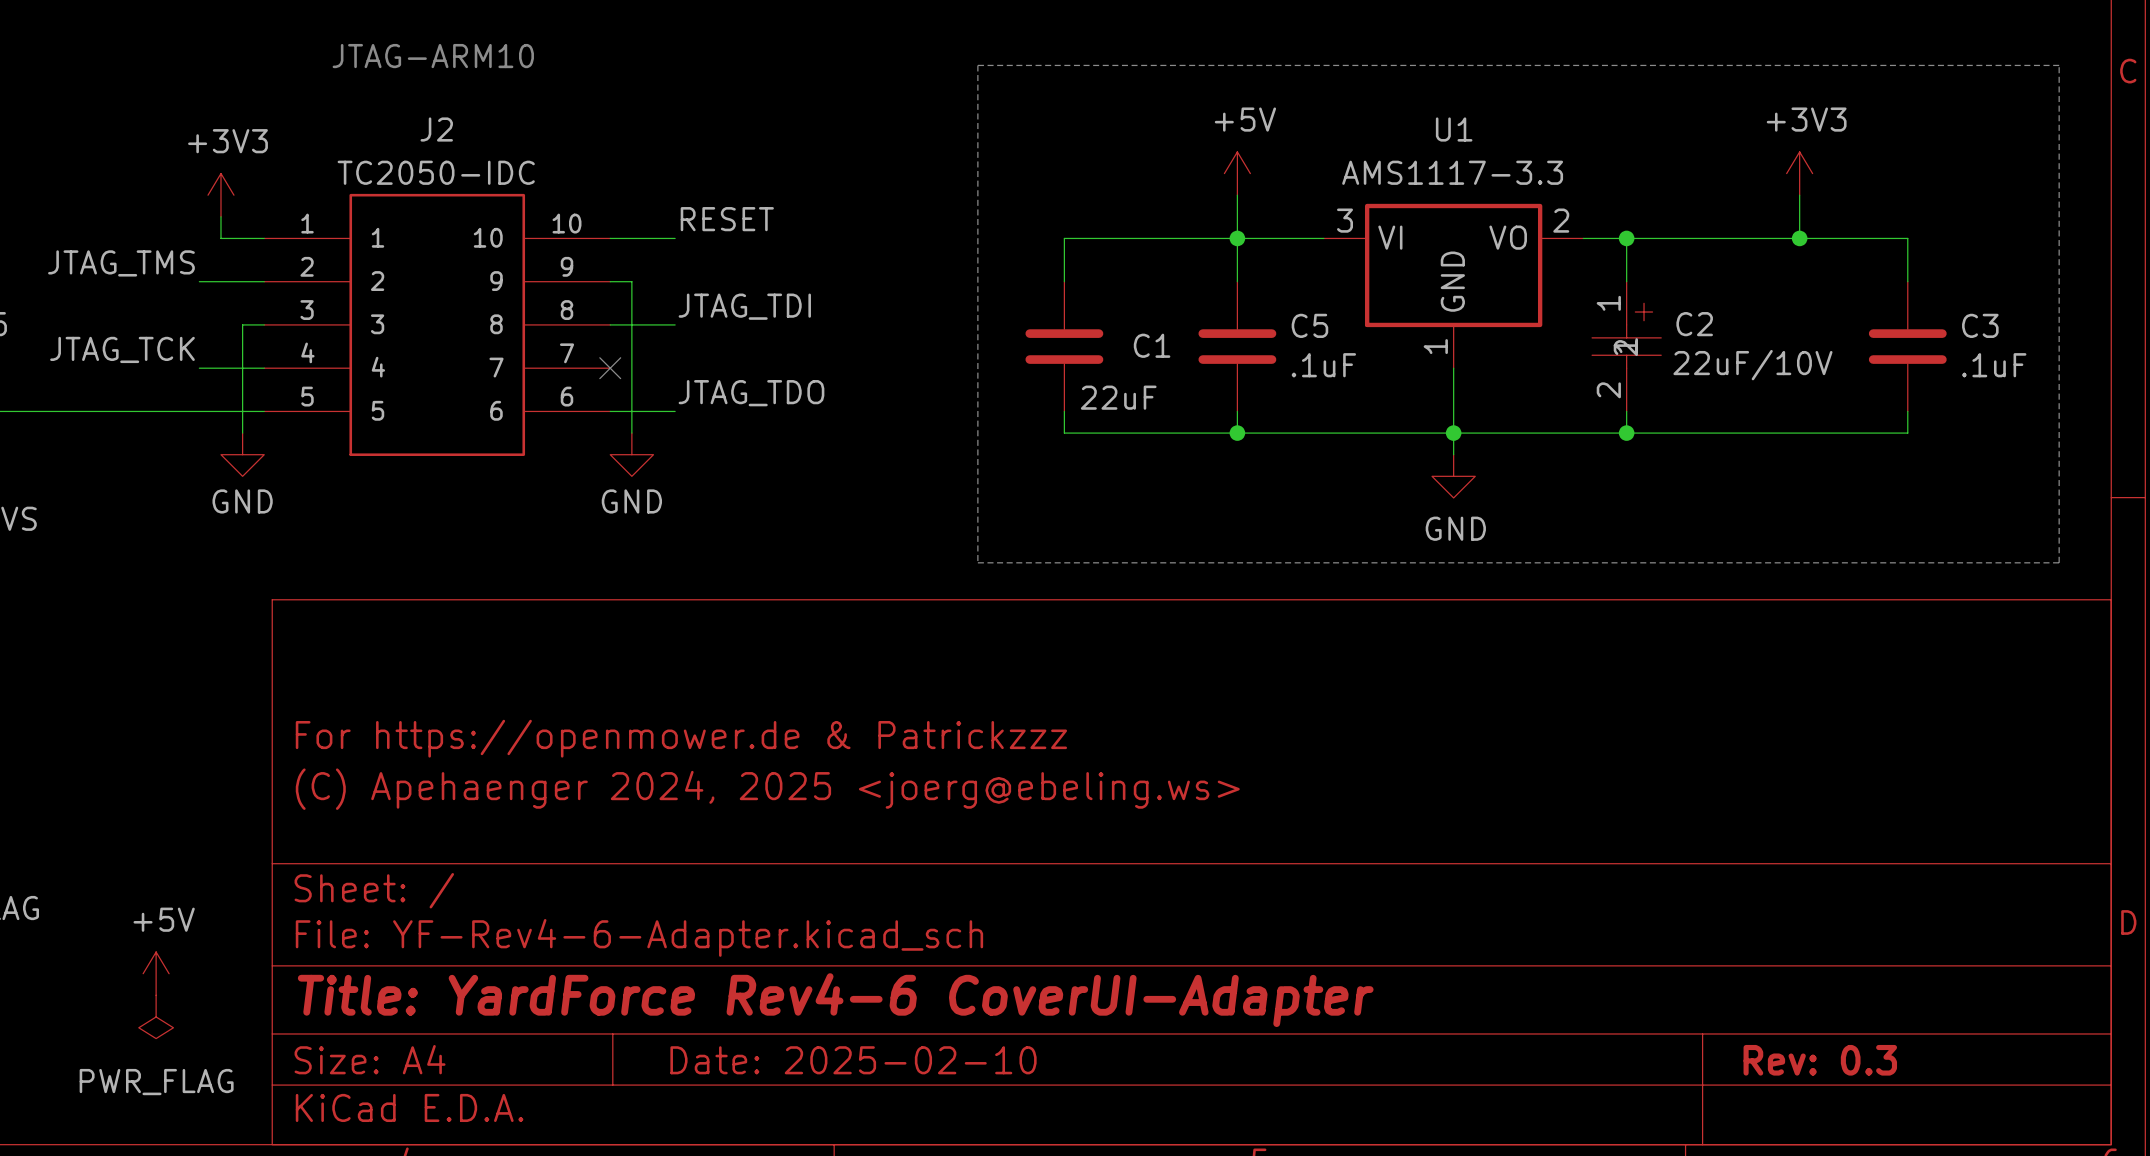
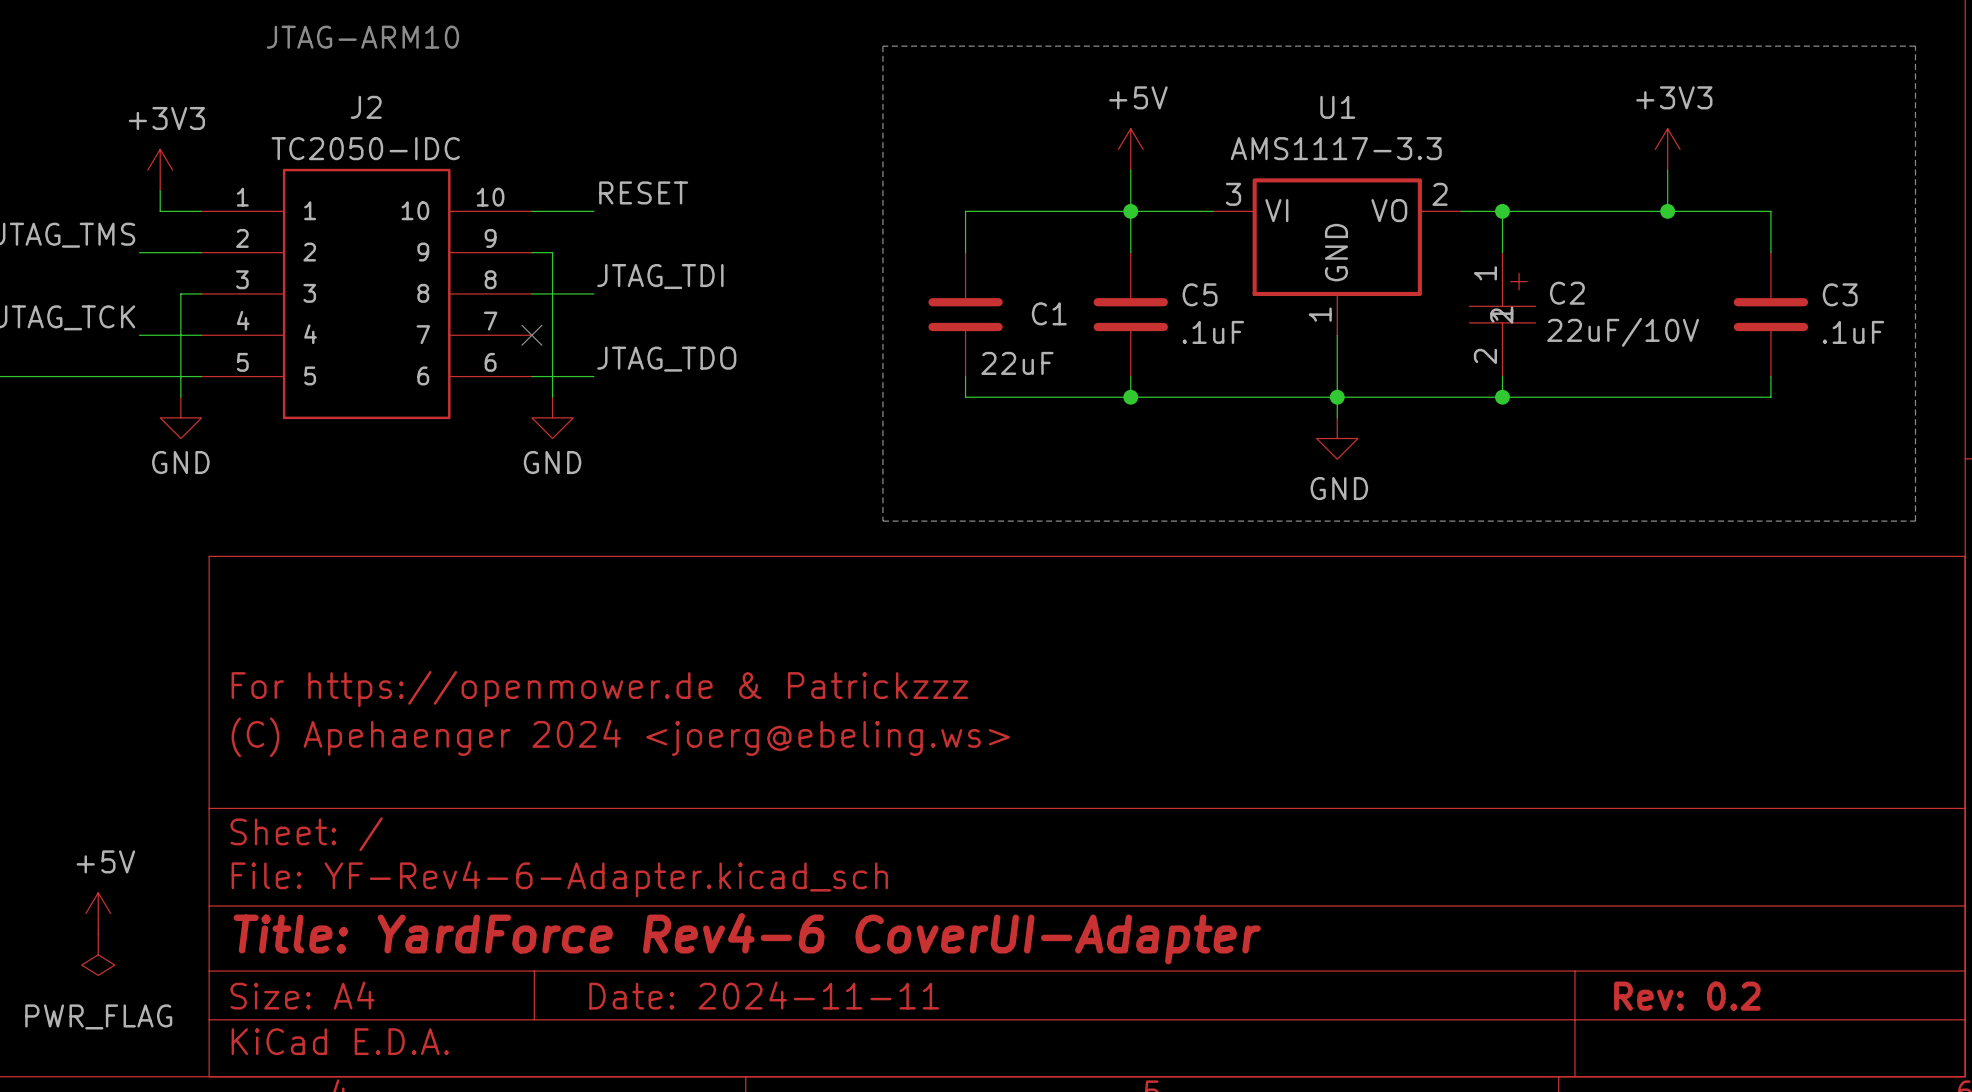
title block: (C) Apehaenger 2024, 2025 <joerg@ebeling.ws> (767, 789) -> (C) Apehaenger 2024 <joerg@ebeling.ws> (620, 737)
title block: Date: 2025-02-10 (853, 1060) -> Date: 2024-11-11 (764, 995)
title block: Rev: 0.3 (1820, 1060) -> Rev: 0.2 (1687, 996)

